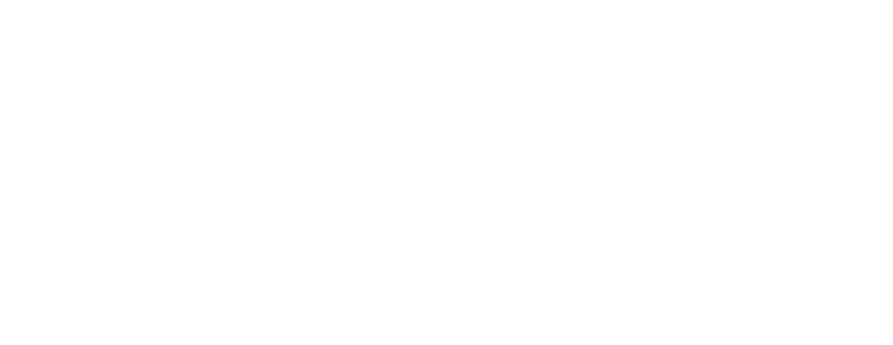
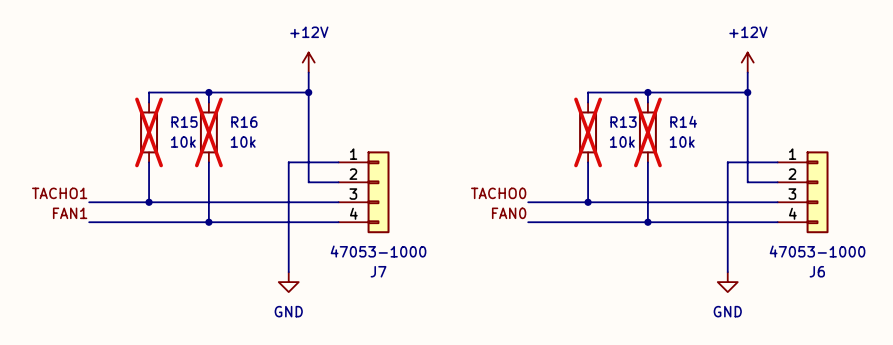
power symbol: none -> +12V (308, 62)
power symbol: none -> +12V (747, 62)
wire: none -> (308, 72) (308, 182) (338, 182)
wire: none -> (747, 72) (747, 182) (777, 182)
wire: none -> (208, 92) (208, 102)
junction: none -> (208, 92)
wire: none -> (308, 92) (149, 92) (149, 102)
junction: none -> (308, 92)
wire: none -> (647, 92) (647, 102)
junction: none -> (647, 92)
wire: none -> (747, 92) (588, 92) (588, 102)
junction: none -> (747, 92)
R15: none -> 10k (149, 132)
R16: none -> 10k (208, 132)
R13: none -> 10k (588, 132)
R14: none -> 10k (647, 132)
wire: none -> (149, 162) (149, 202)
wire: none -> (208, 162) (208, 222)
wire: none -> (338, 162) (288, 162) (288, 272)
wire: none -> (588, 162) (588, 202)
wire: none -> (647, 162) (647, 222)
wire: none -> (777, 162) (727, 162) (727, 272)
J7: none -> 47053-1000 (364, 192)
J6: none -> 47053-1000 (803, 192)
label: none -> TACHO1 (59, 193)
label: none -> TACHO0 (498, 193)
wire: none -> (89, 202) (338, 202)
junction: none -> (149, 202)
wire: none -> (528, 202) (777, 202)
junction: none -> (588, 202)
label: none -> FAN1 (70, 213)
label: none -> FAN0 (509, 213)
wire: none -> (89, 222) (338, 222)
junction: none -> (208, 222)
wire: none -> (528, 222) (777, 222)
junction: none -> (647, 222)
power symbol: none -> GND (288, 282)
power symbol: none -> GND (727, 282)

